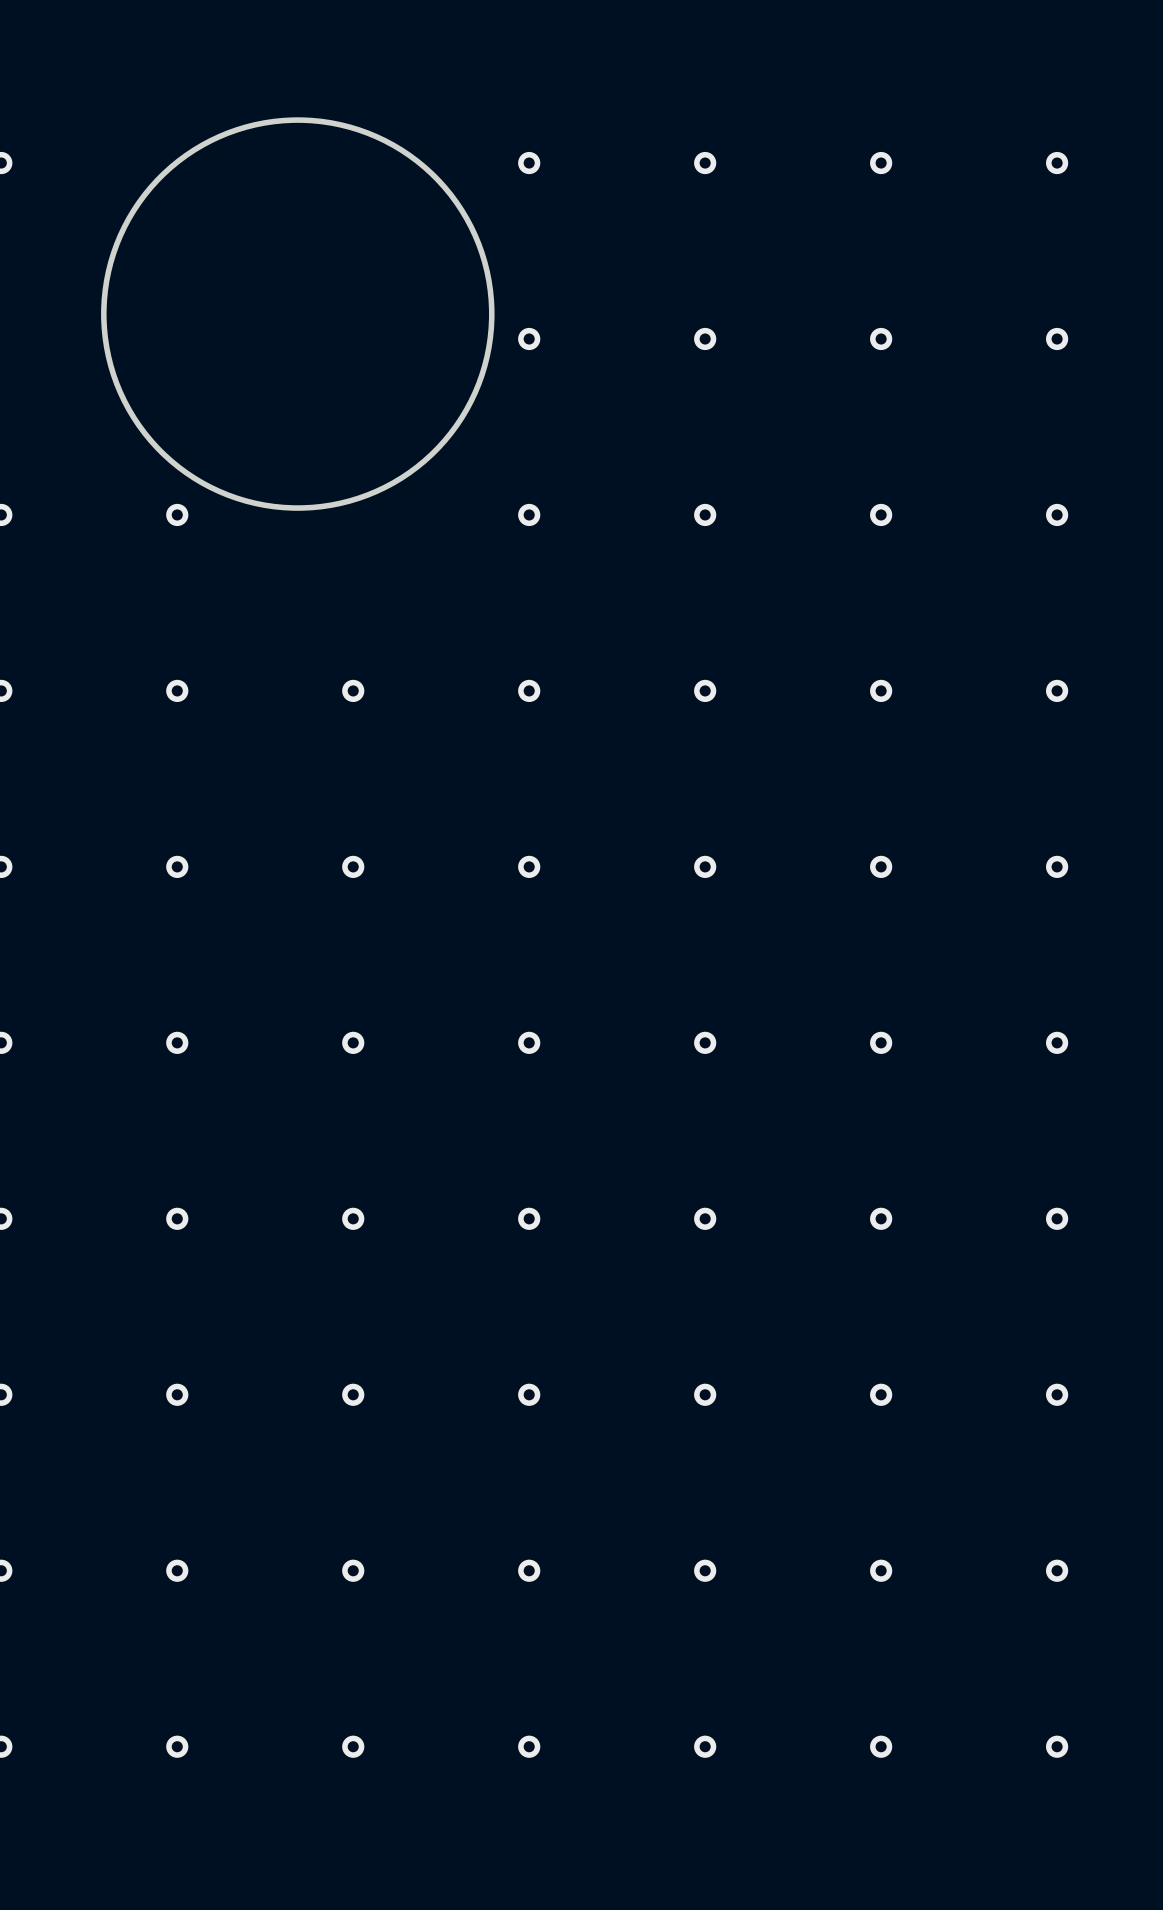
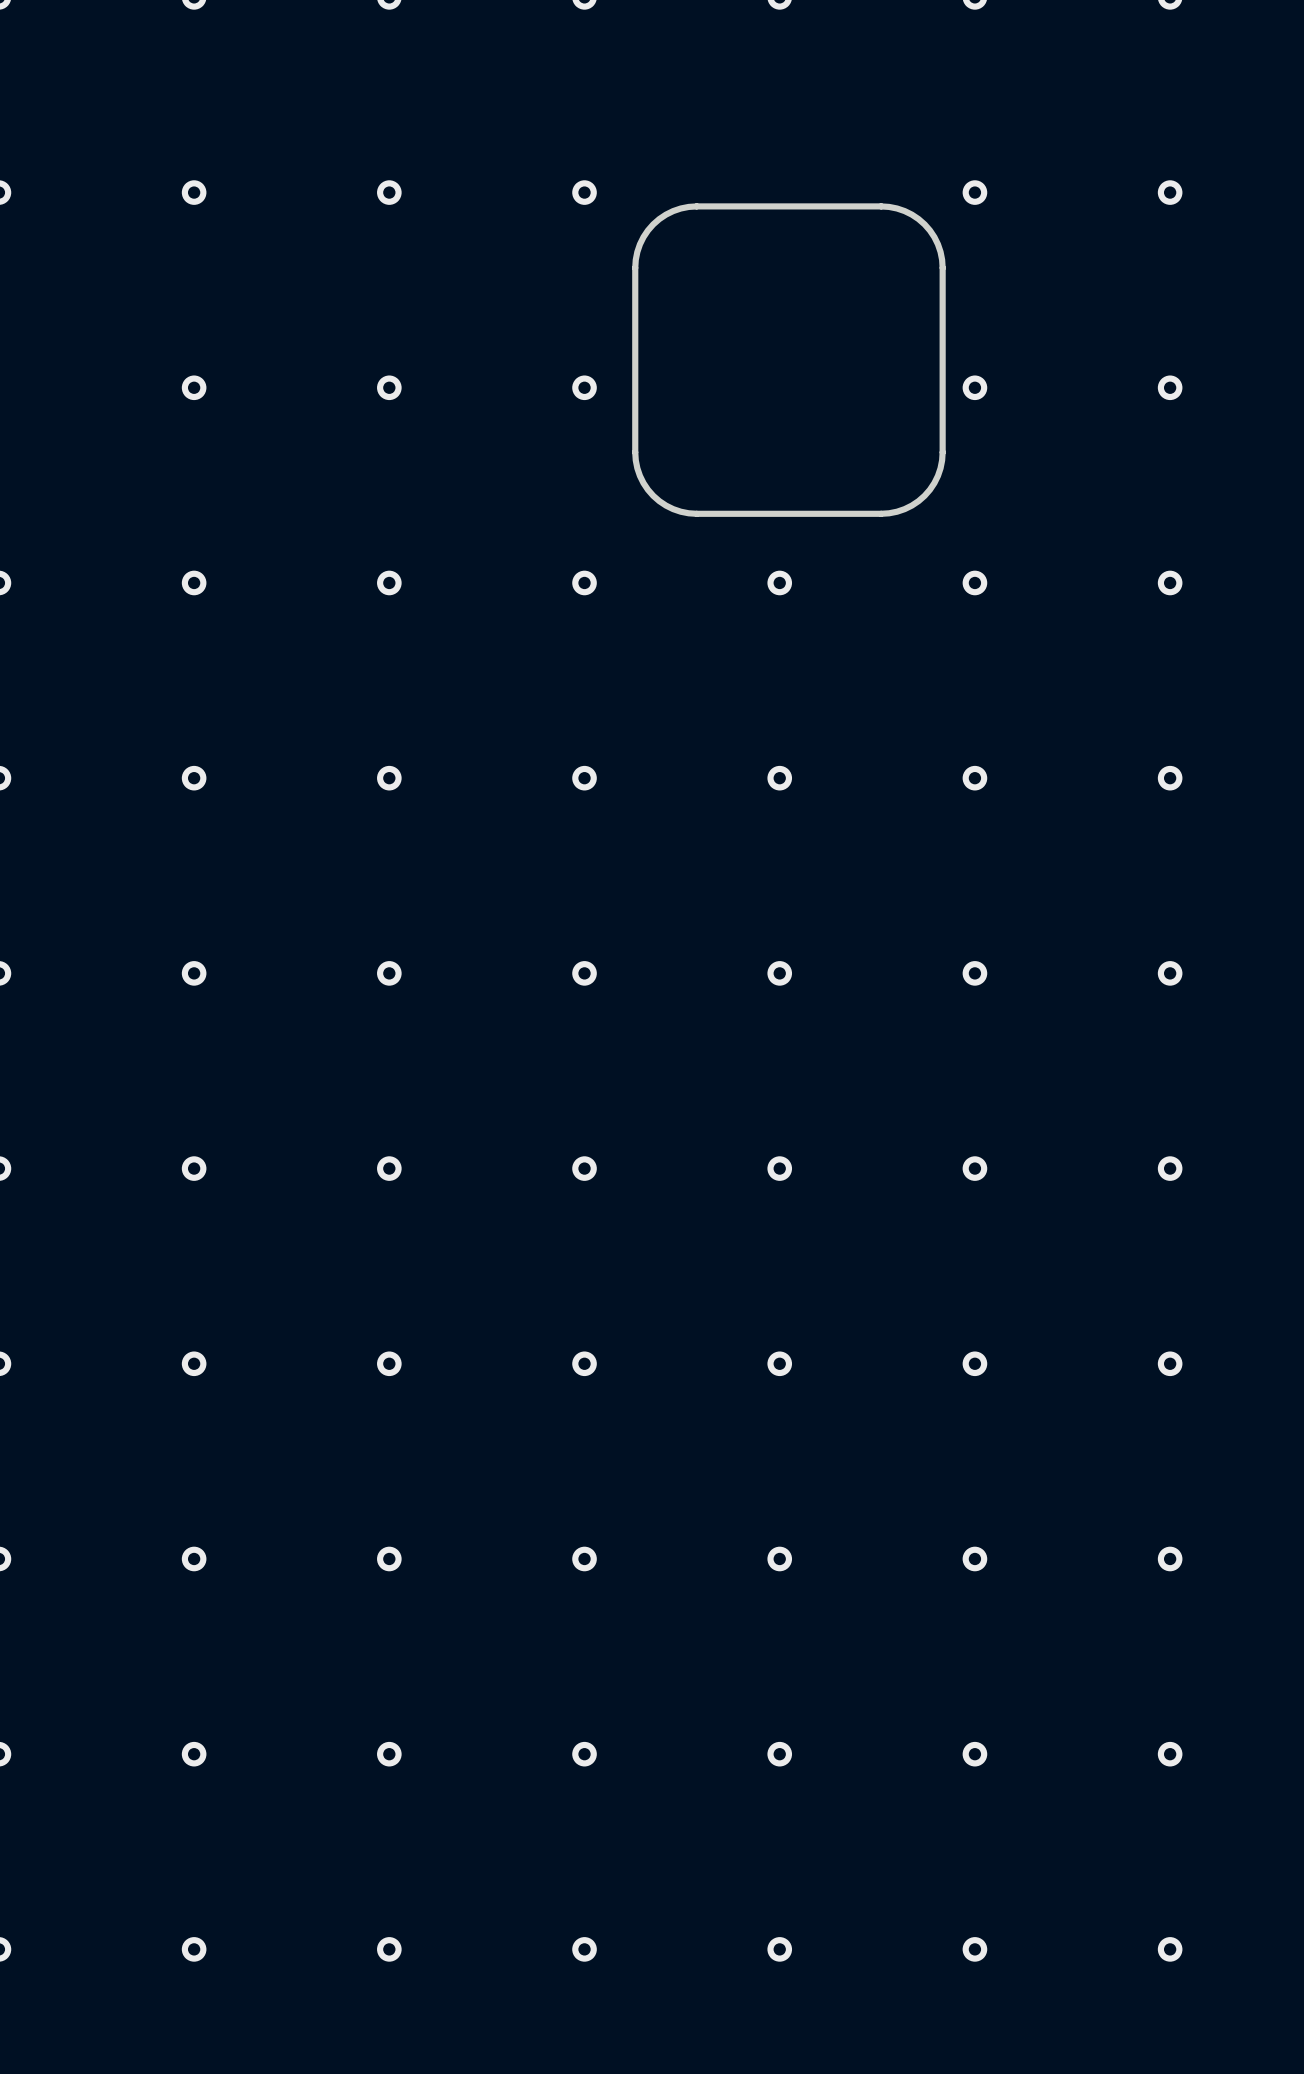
round board edge: [101, 117, 495, 511] -> none
via: none -> (194, 192)
via: none -> (389, 192)
via: (705, 163) -> none
board edge: none -> (696, 206) (889, 206) (911, 214) (929, 230) (937, 244) (942, 267) (942, 452) (937, 475) (929, 489) (918, 501) (897, 511) (881, 513) (696, 513) (680, 511) (665, 505) (647, 489) (639, 475) (635, 452) (635, 259) (639, 244) (653, 224) (673, 211) (696, 206)
via: none -> (194, 387)
via: none -> (389, 387)
via: (705, 338) -> none
via: none -> (389, 582)

